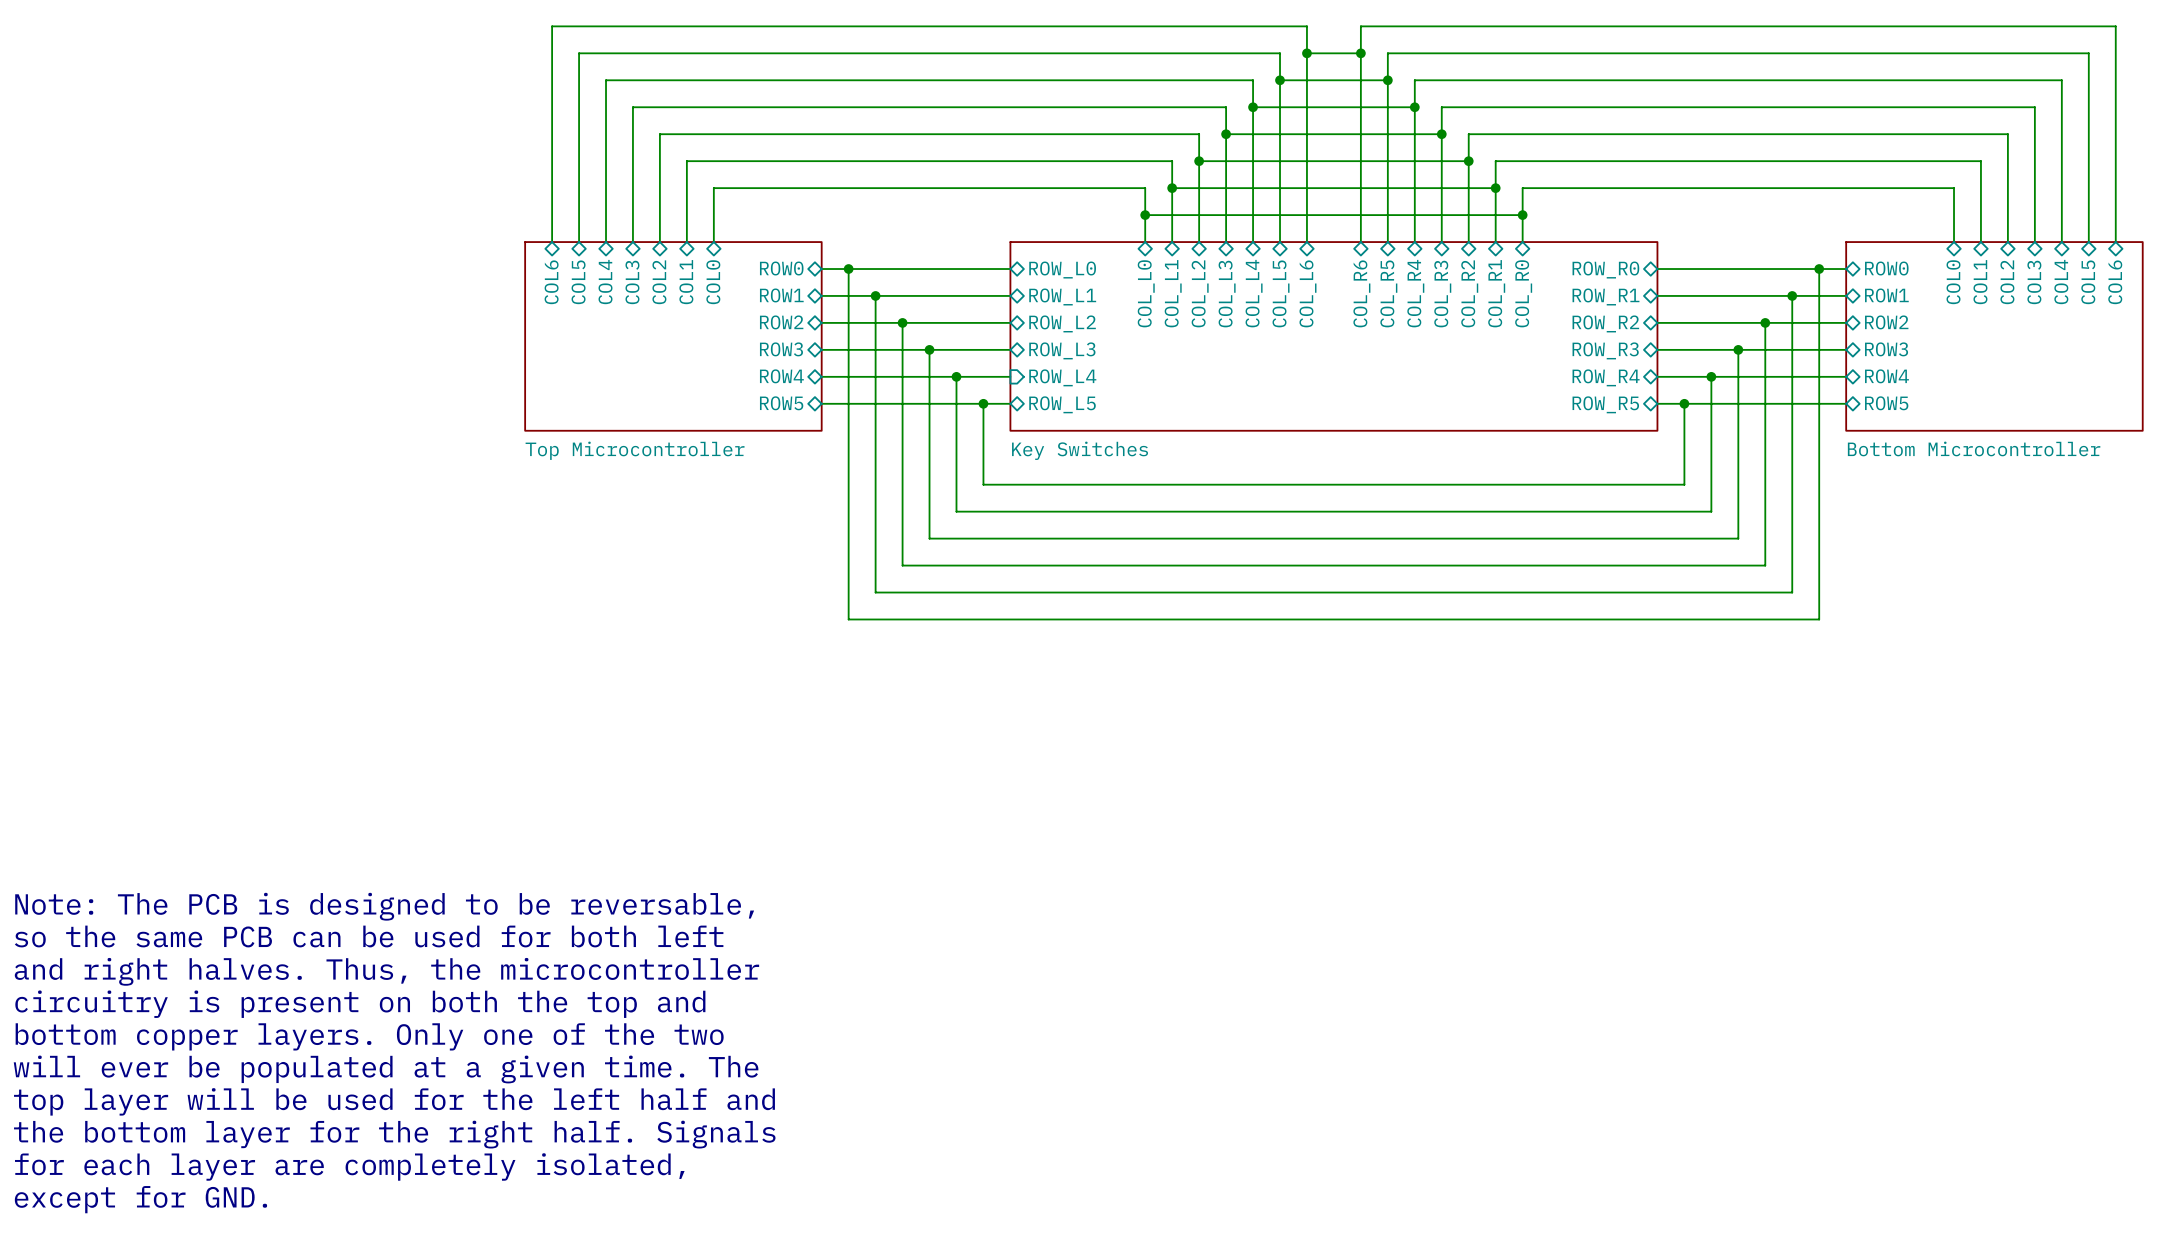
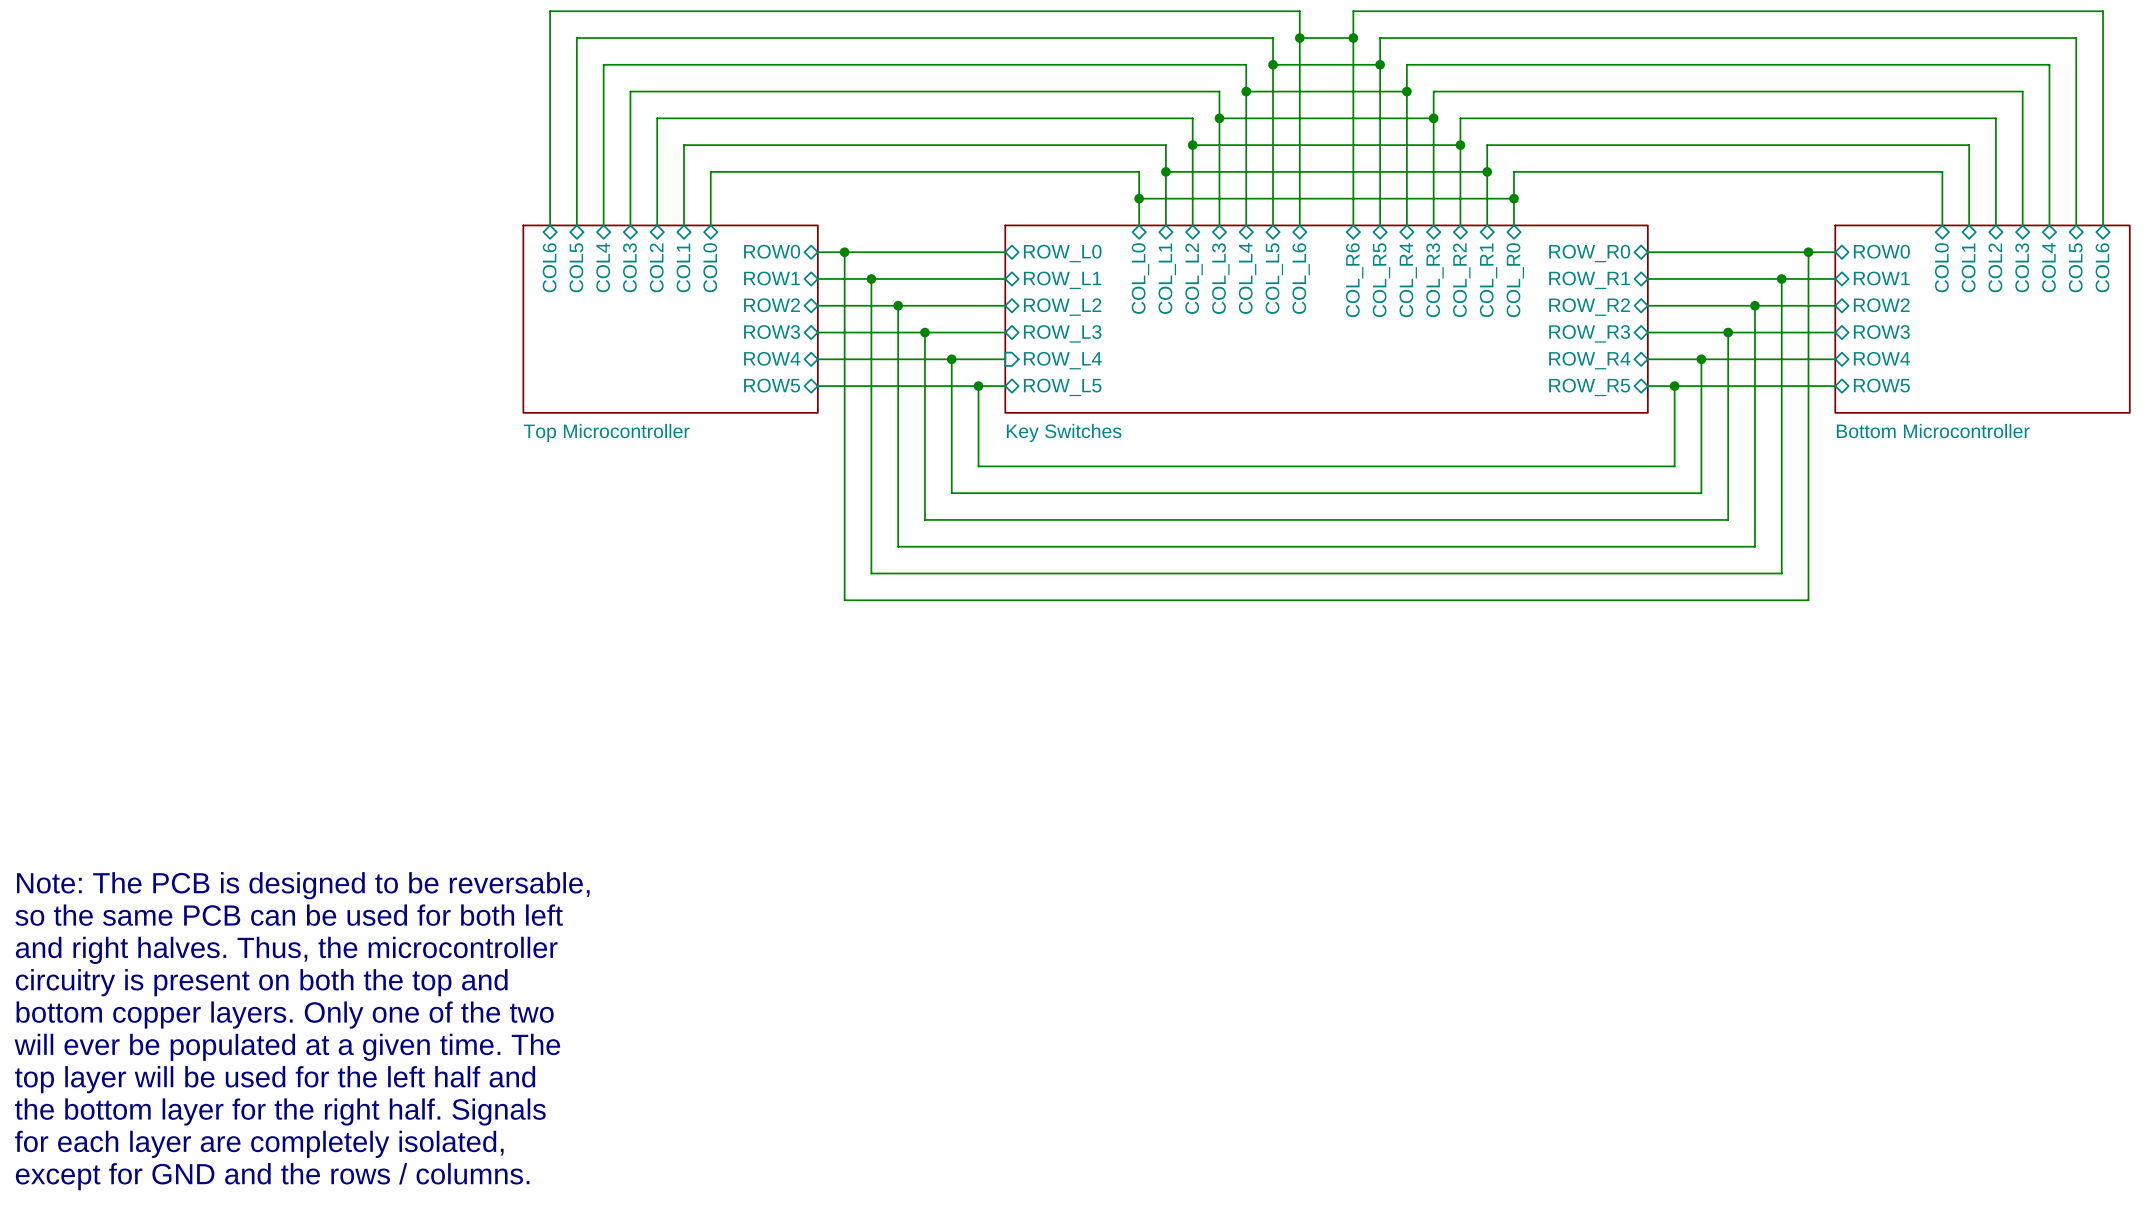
text: except for GND. (140, 1199) -> except for GND and the rows / columns. (272, 1176)

